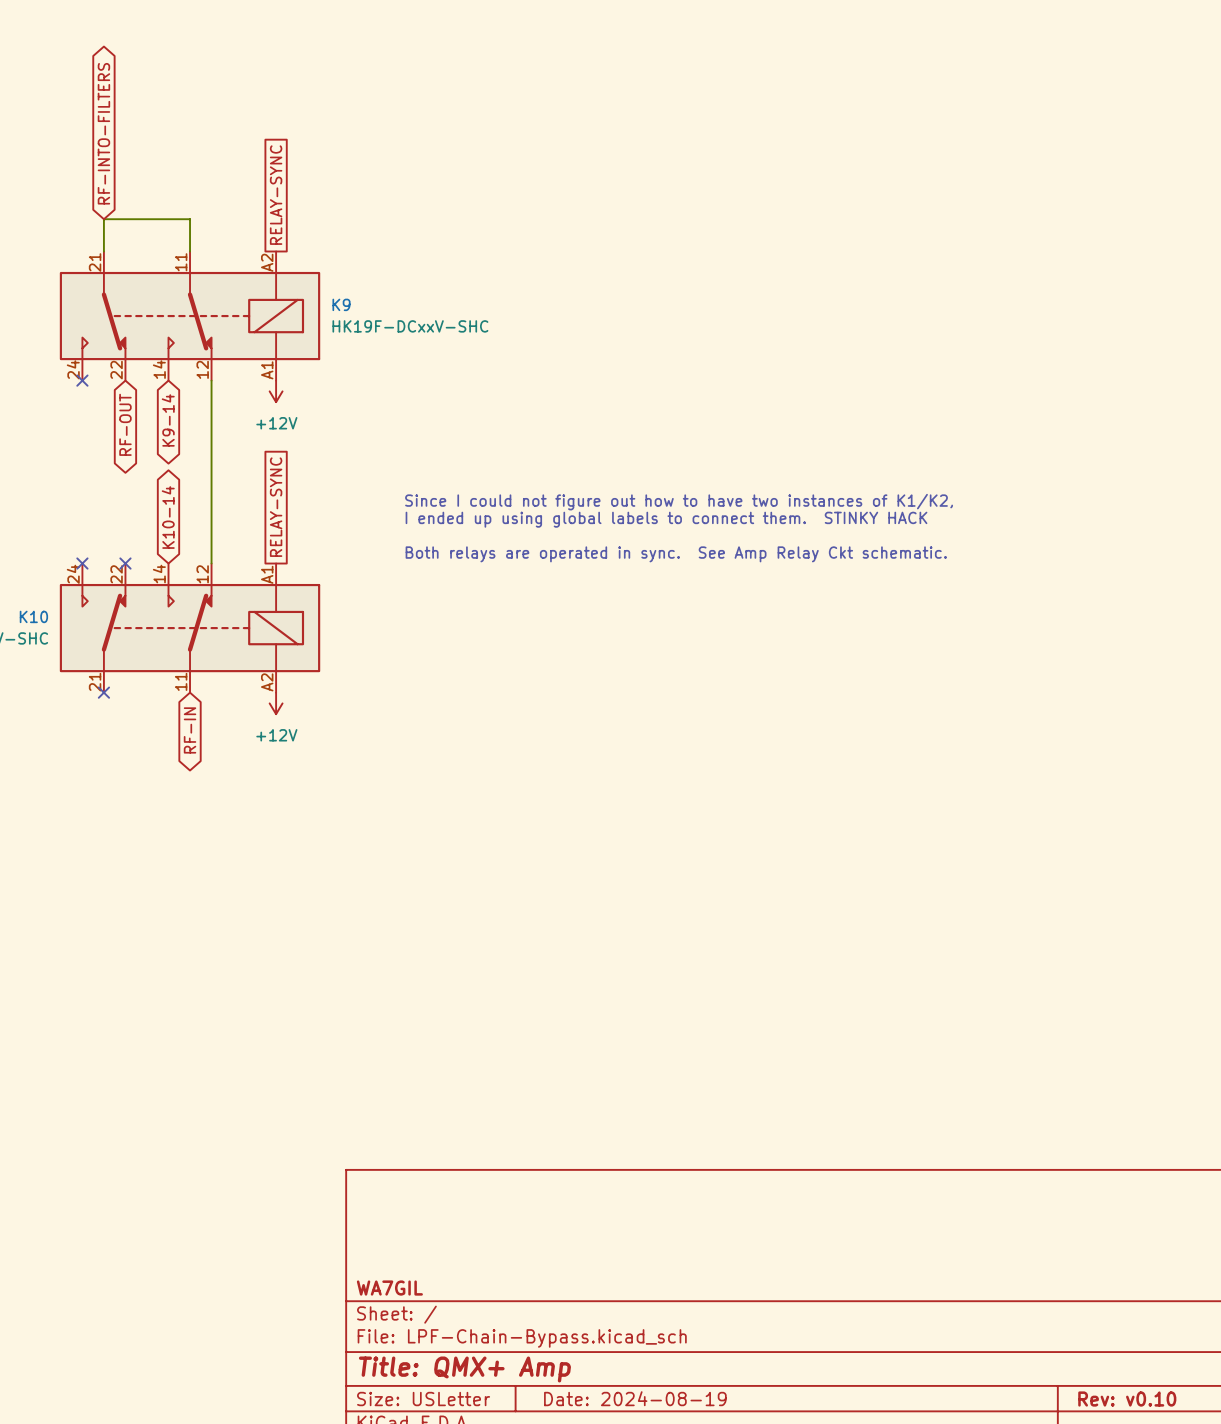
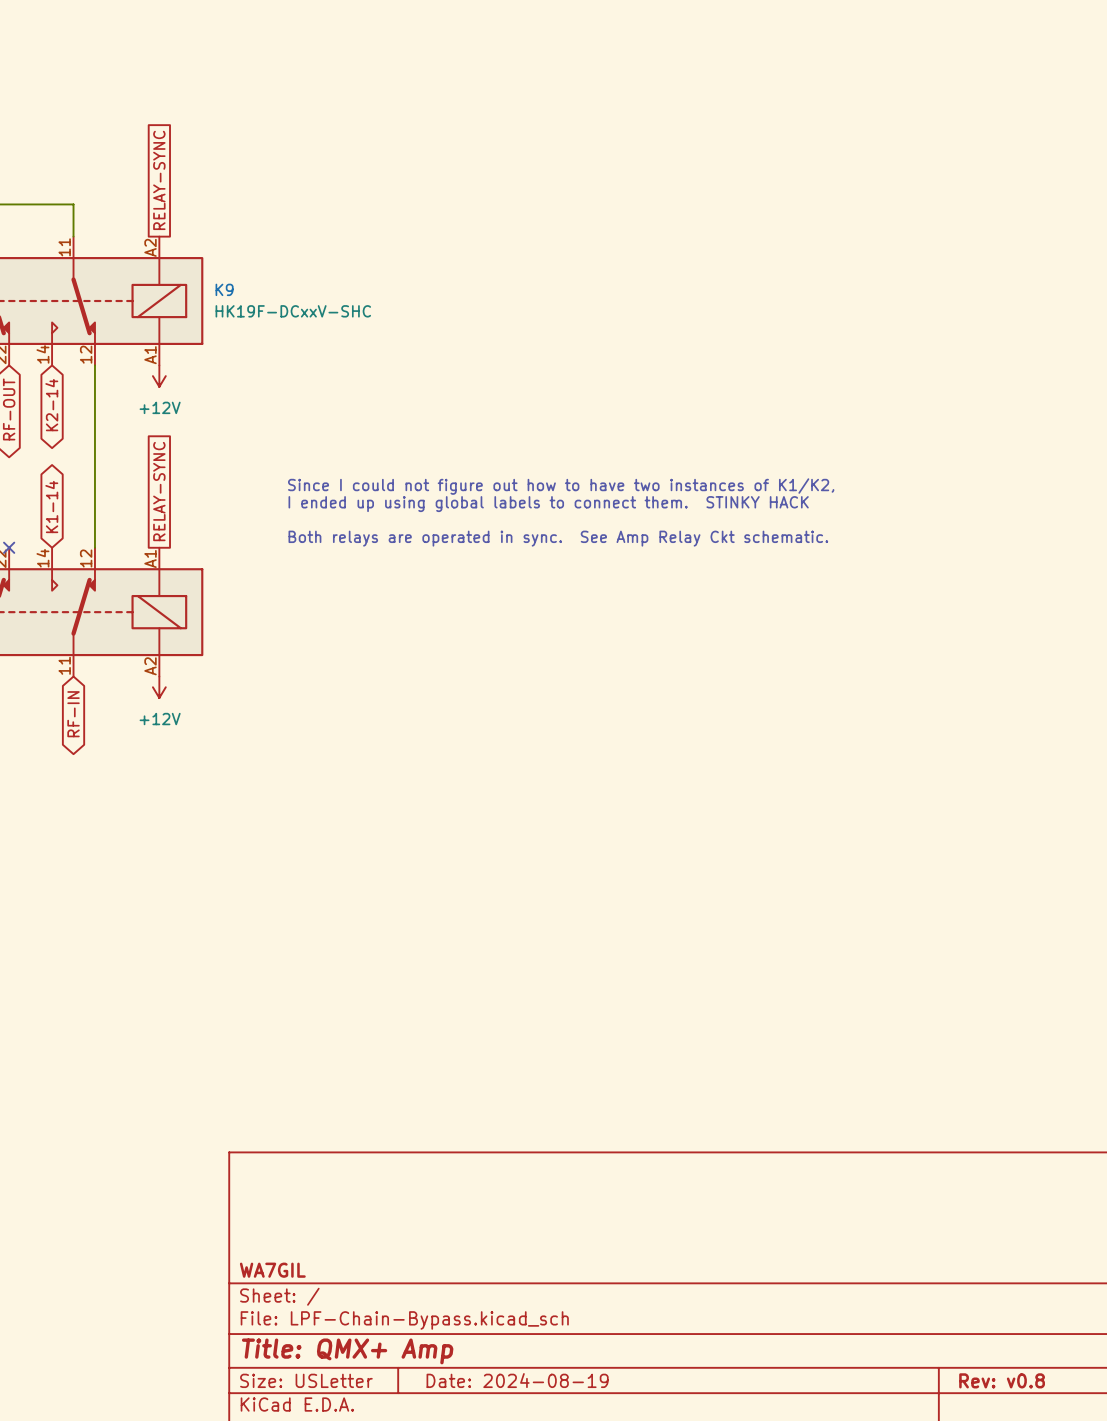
global label: K9-14 (168, 420) -> K2-14 (51, 405)
global label: K10-14 (168, 517) -> K1-14 (51, 507)
title block: Rev: v0.10 (1127, 1399) -> Rev: v0.8 (1002, 1380)

